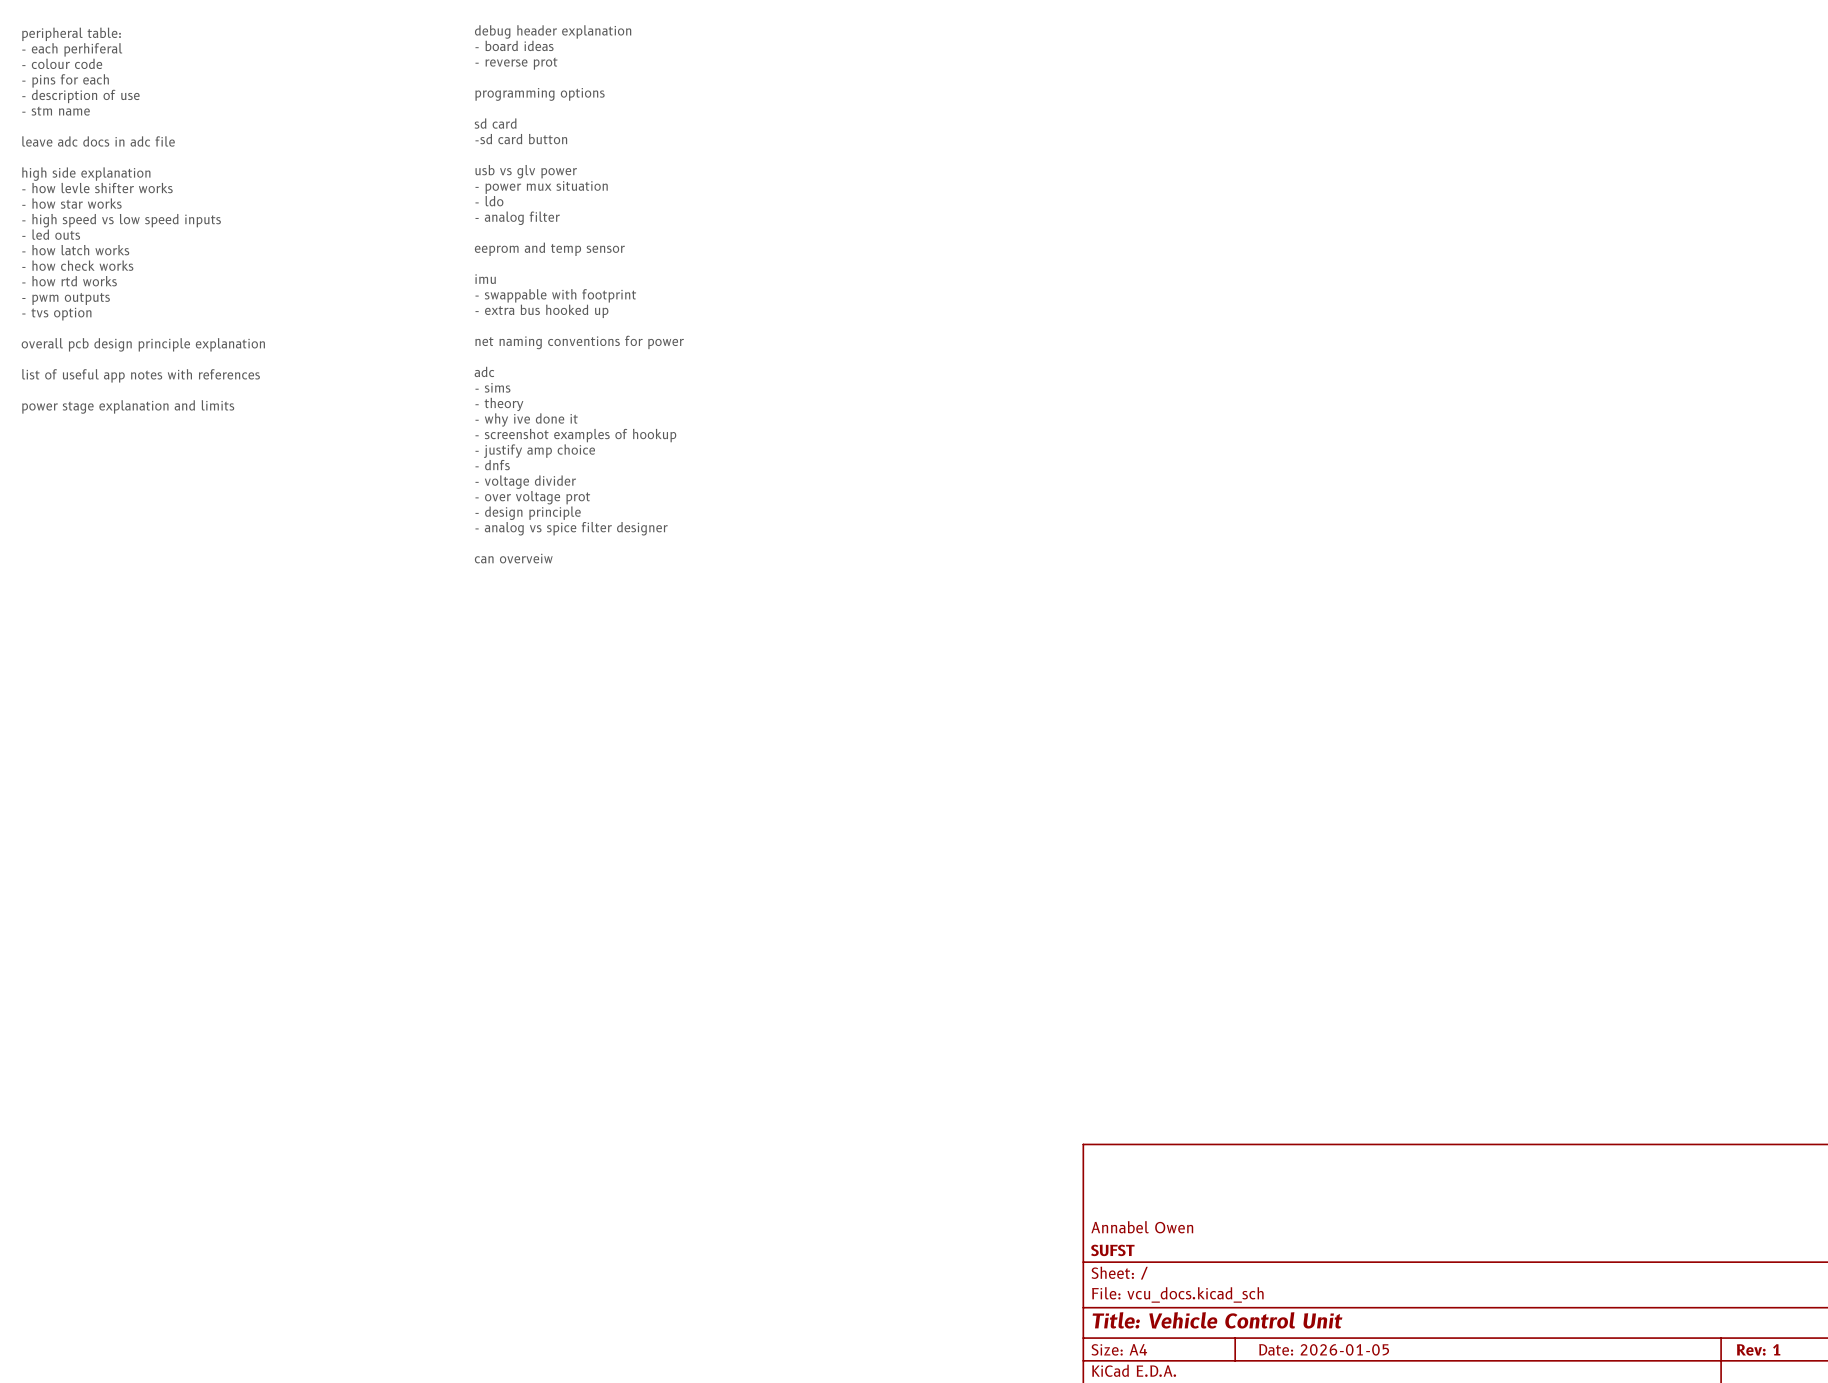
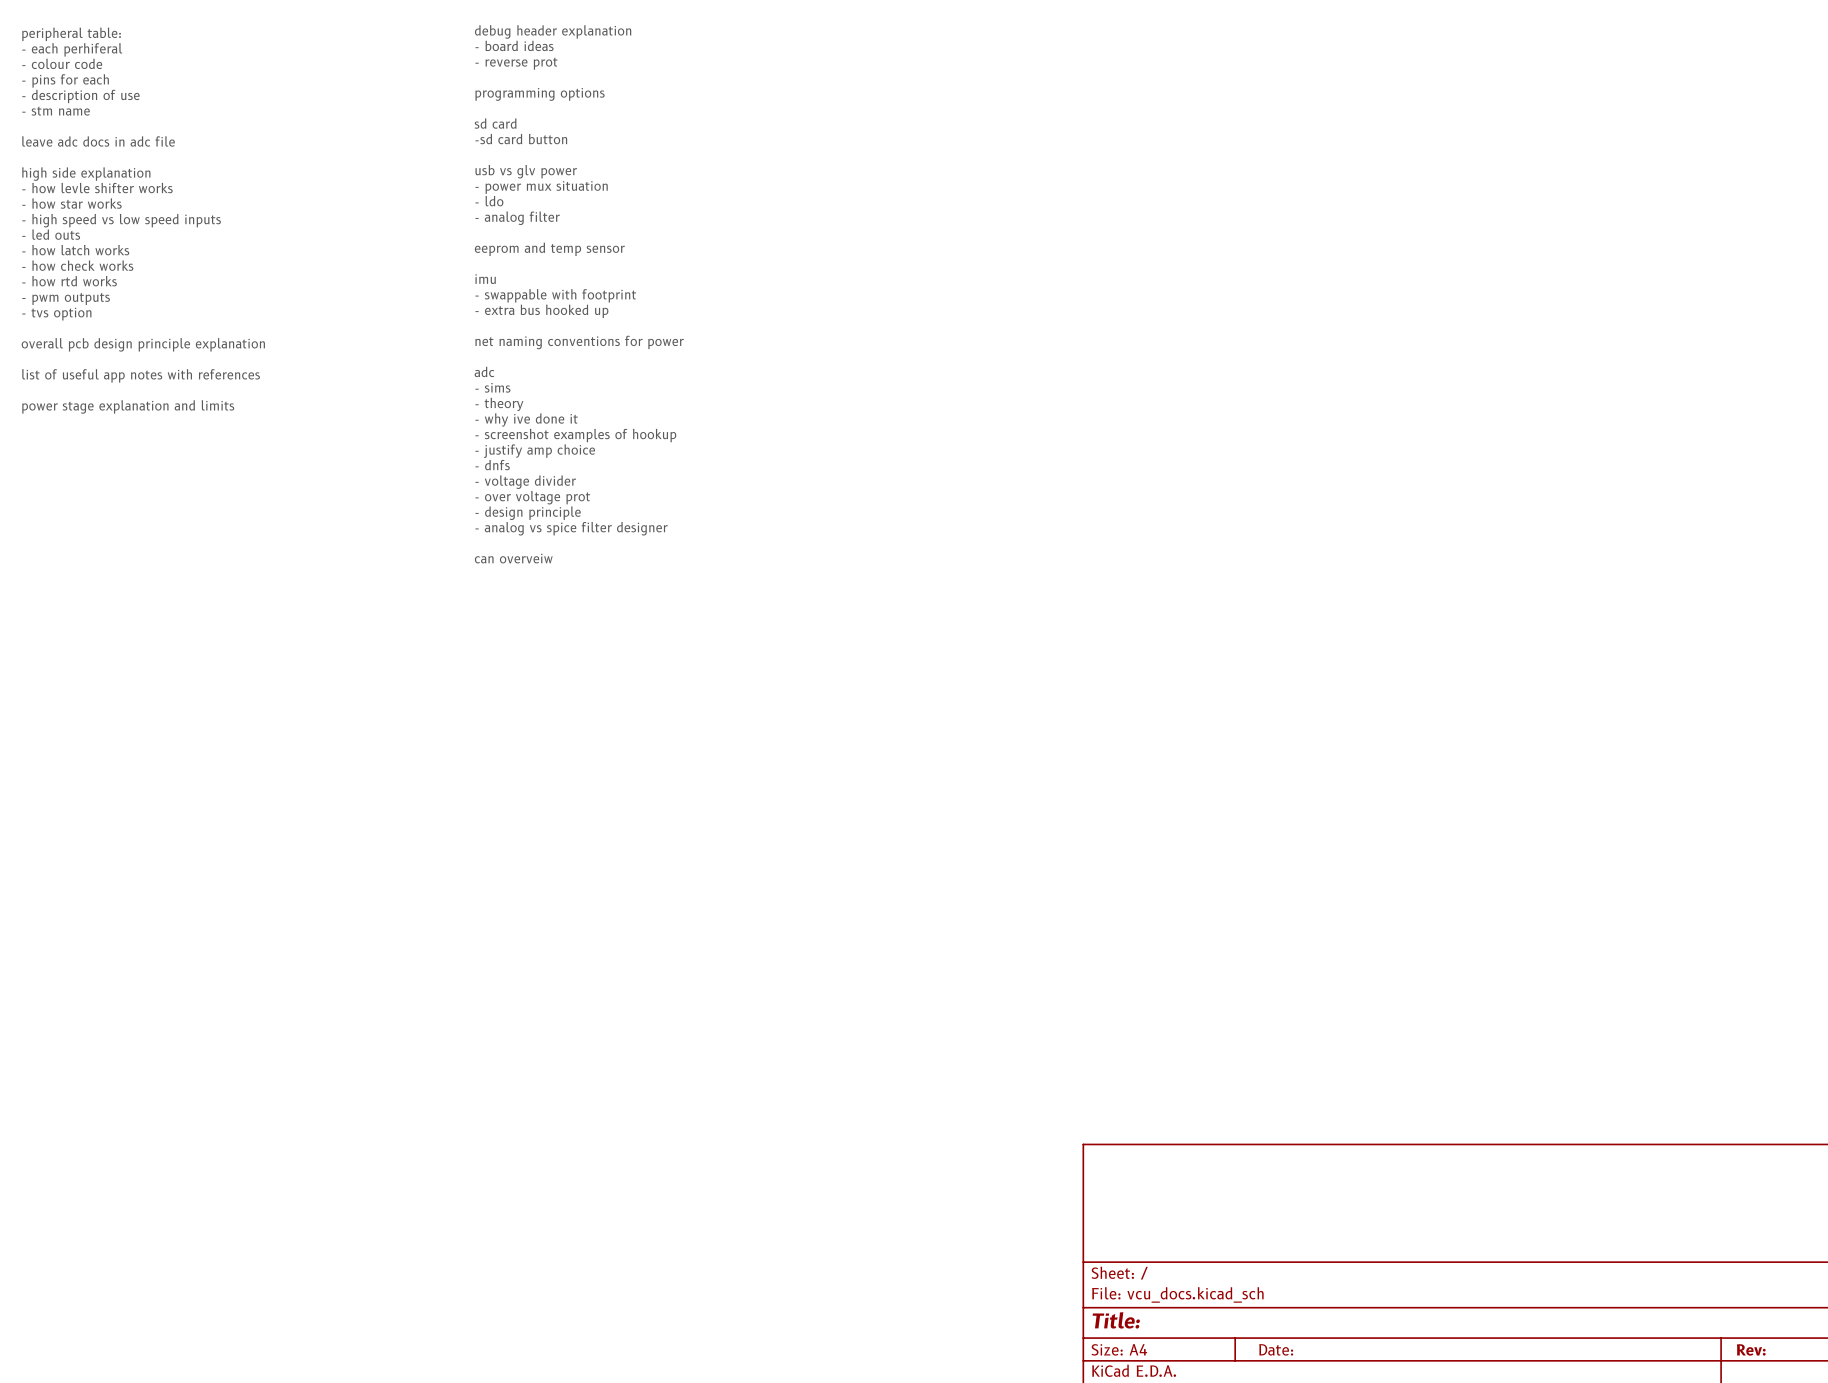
title block: Annabel Owen (1142, 1227) -> none
title block: SUFST (1112, 1250) -> none
title block: Title: Vehicle Control Unit (1217, 1320) -> Title: (1116, 1320)
title block: Date: 2026-01-05 (1324, 1349) -> Date: (1276, 1349)
title block: Rev: 1 (1758, 1349) -> Rev: (1751, 1349)

